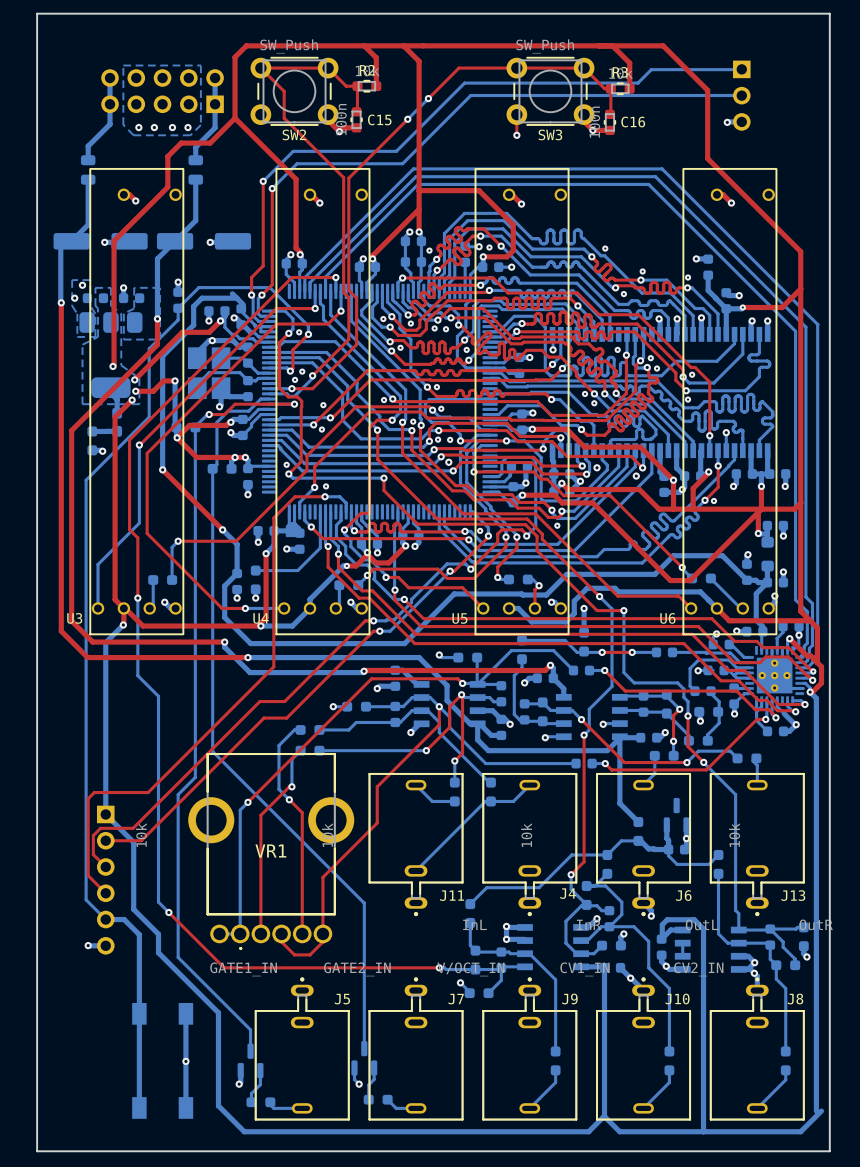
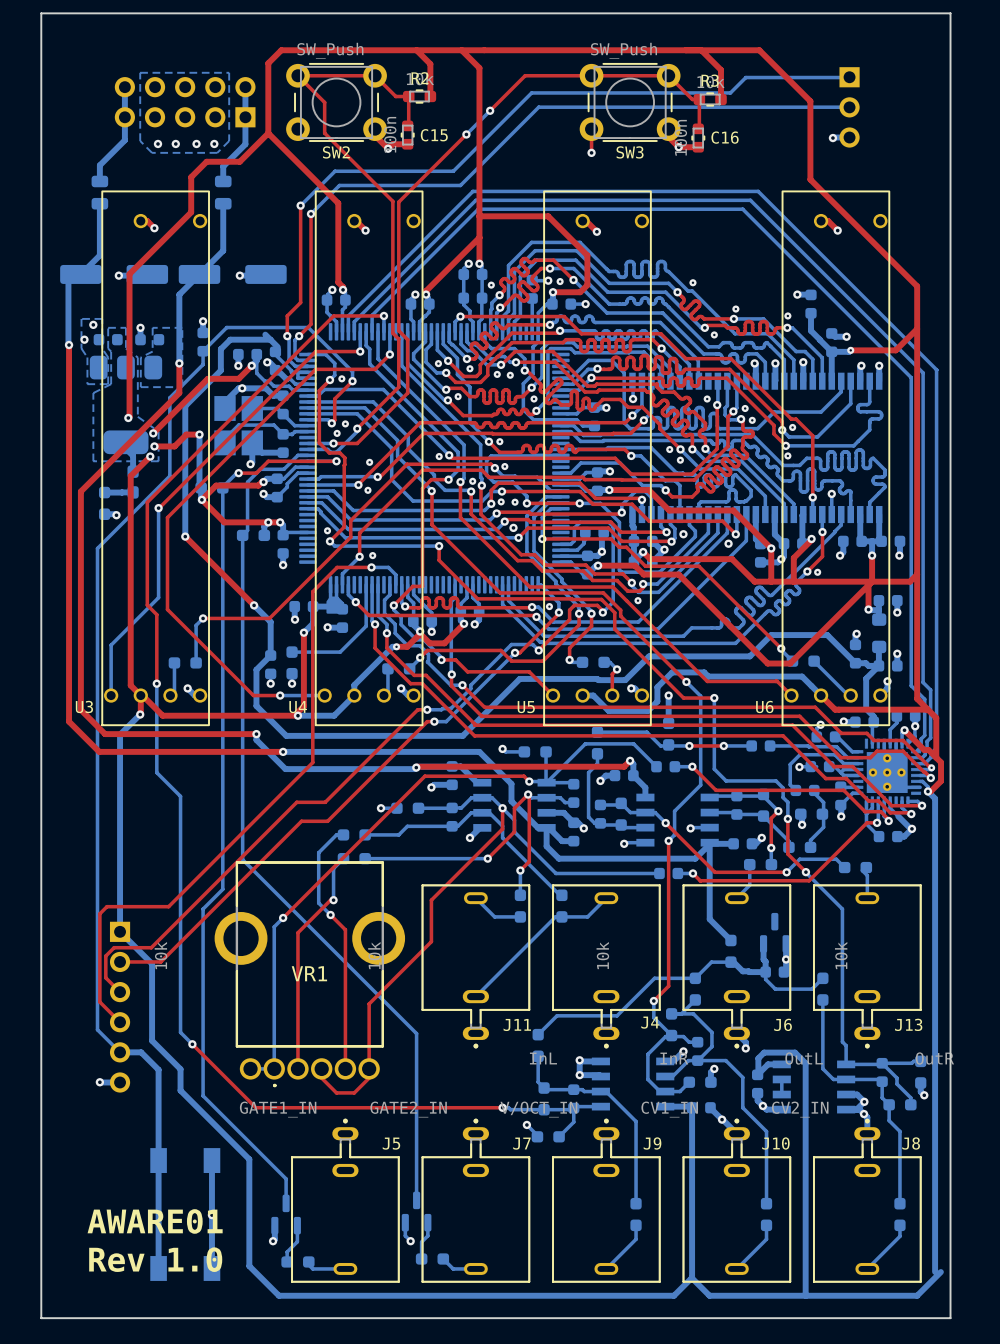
text: none -> AWARE01 (155, 1221)
text: none -> Rev 1.0 (155, 1259)

